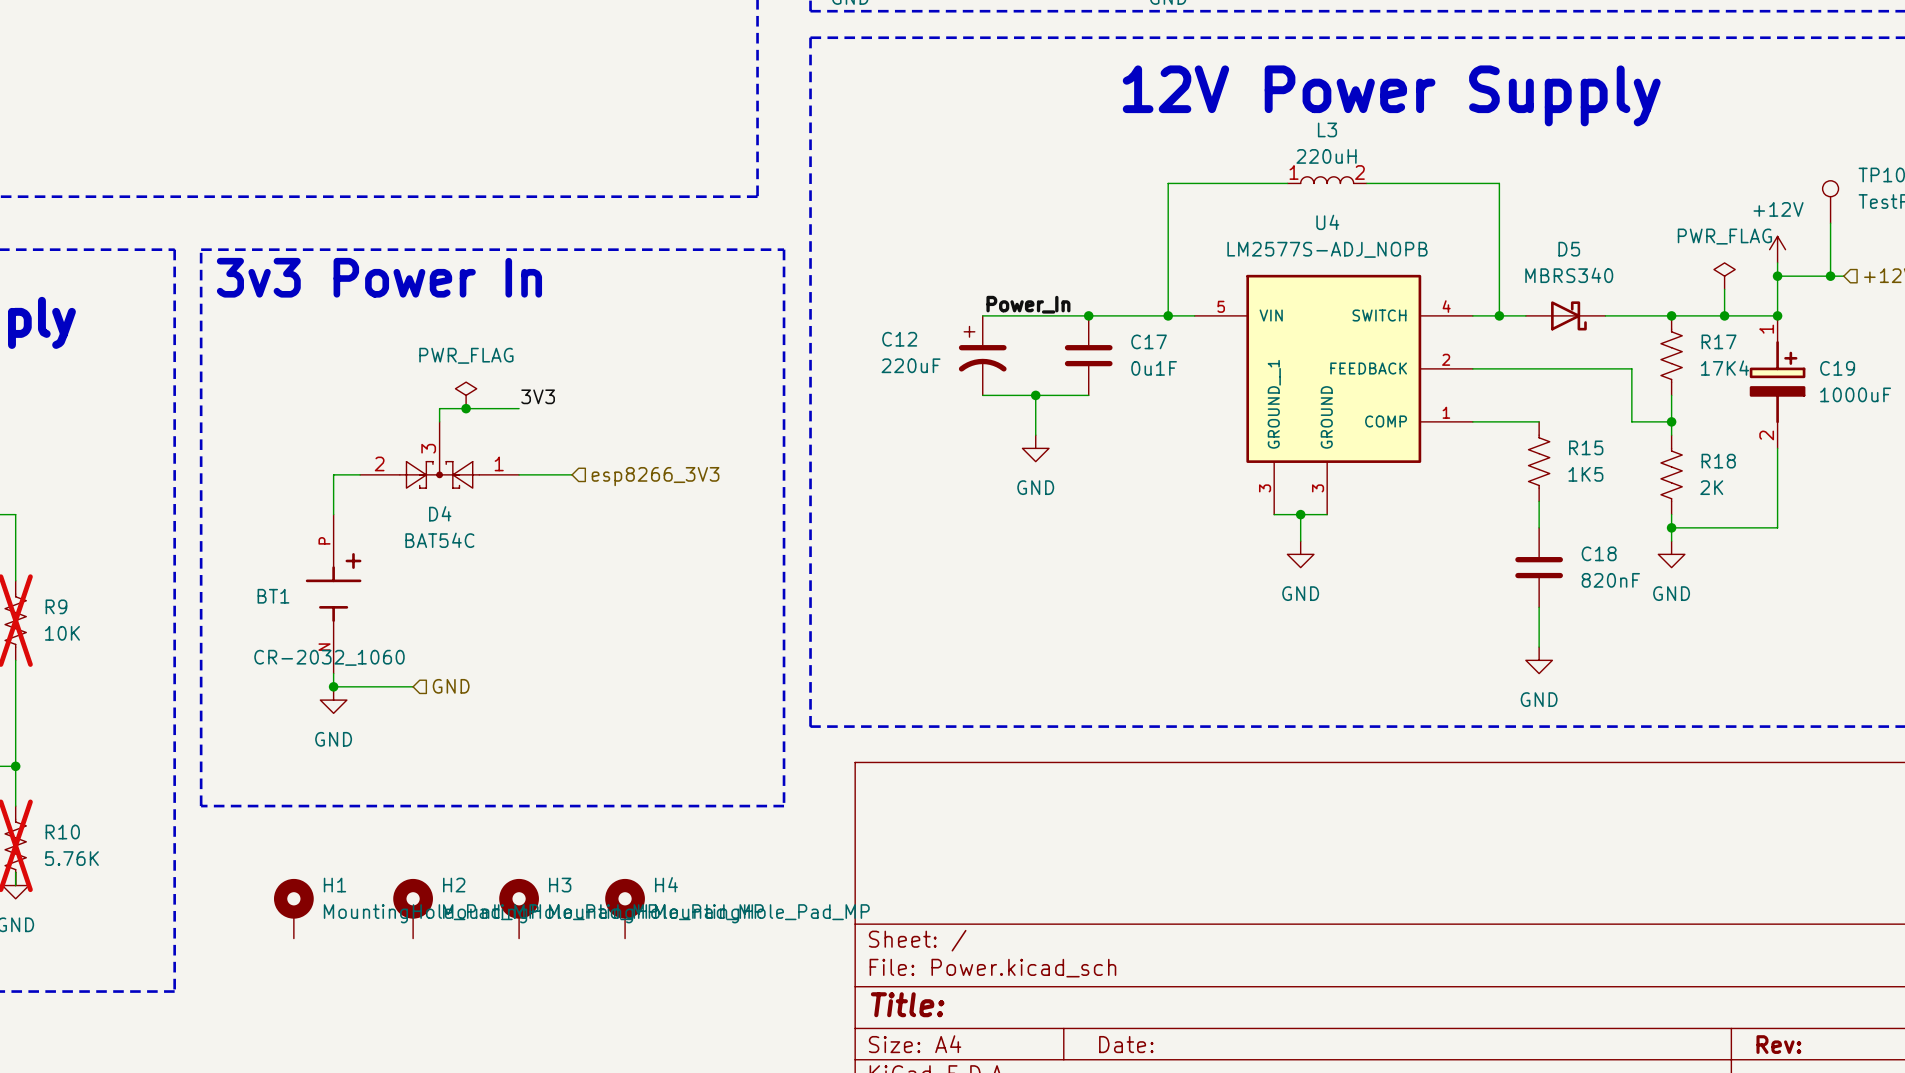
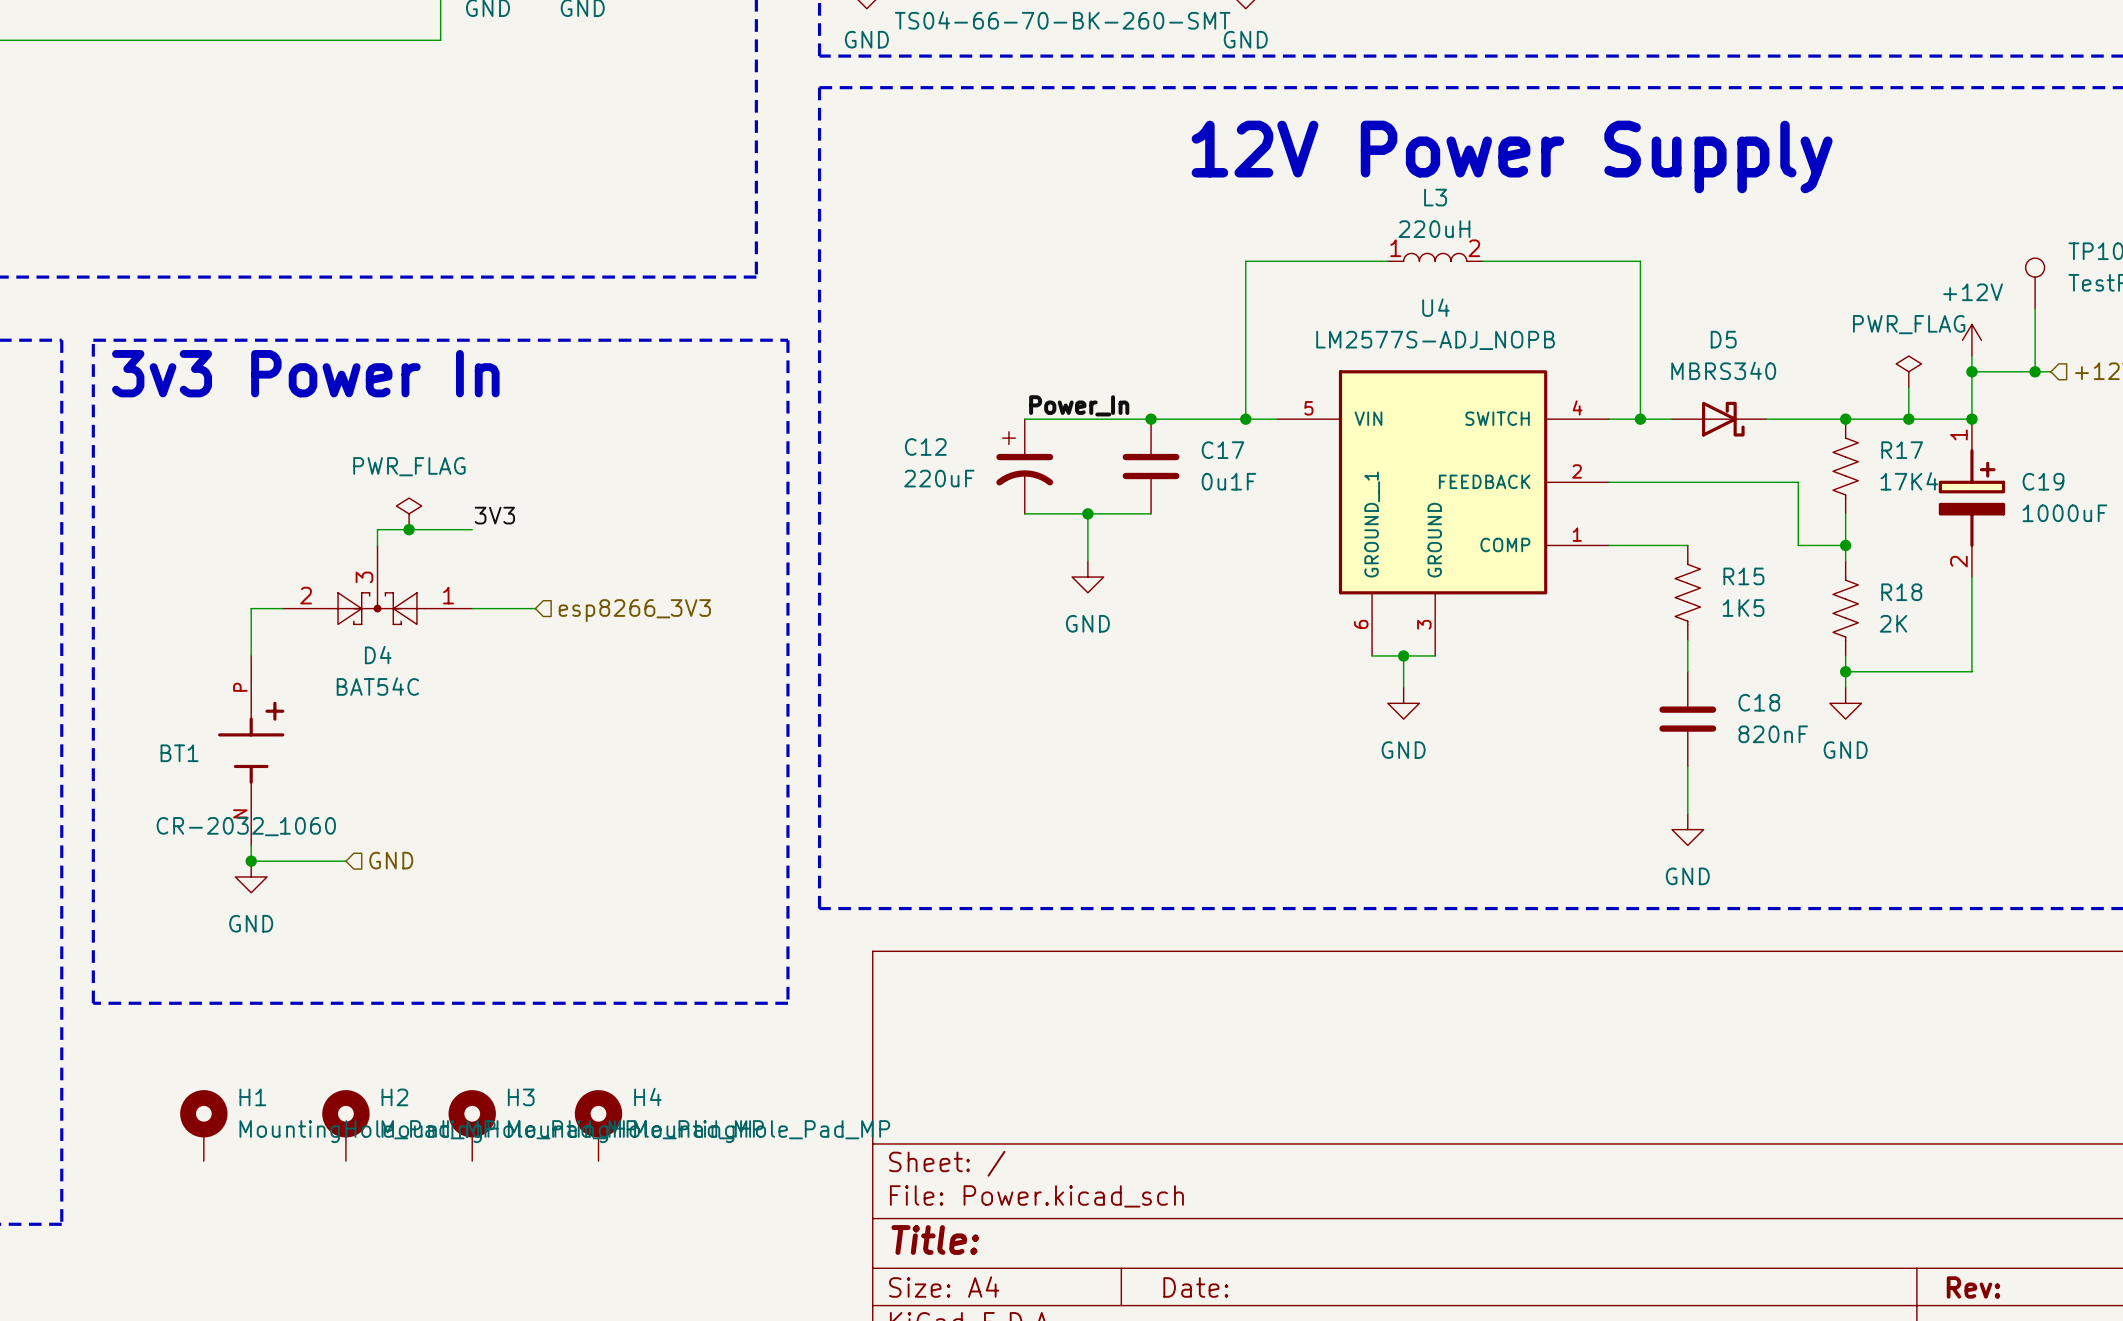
U4 pin number: 3 (1265, 488) -> 6 (1361, 624)

